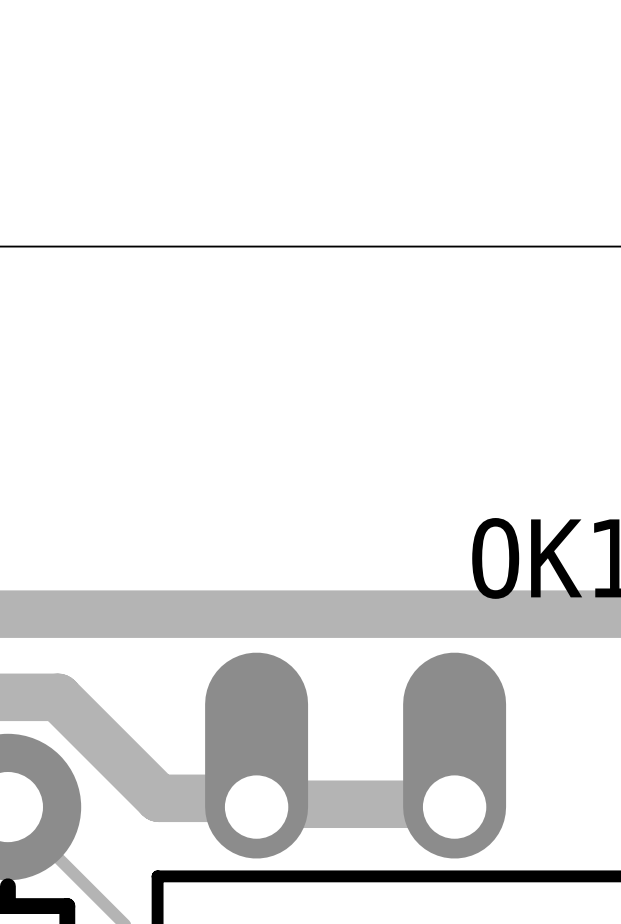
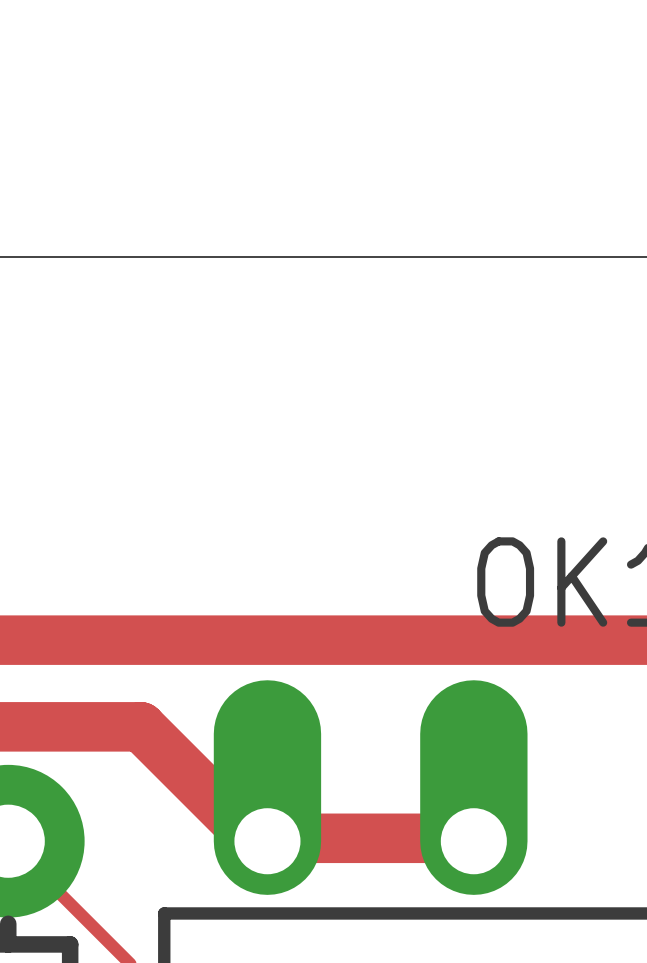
track: (57, 697) (158, 798) (236, 798) -> (60, 726) (140, 726) (246, 832)

